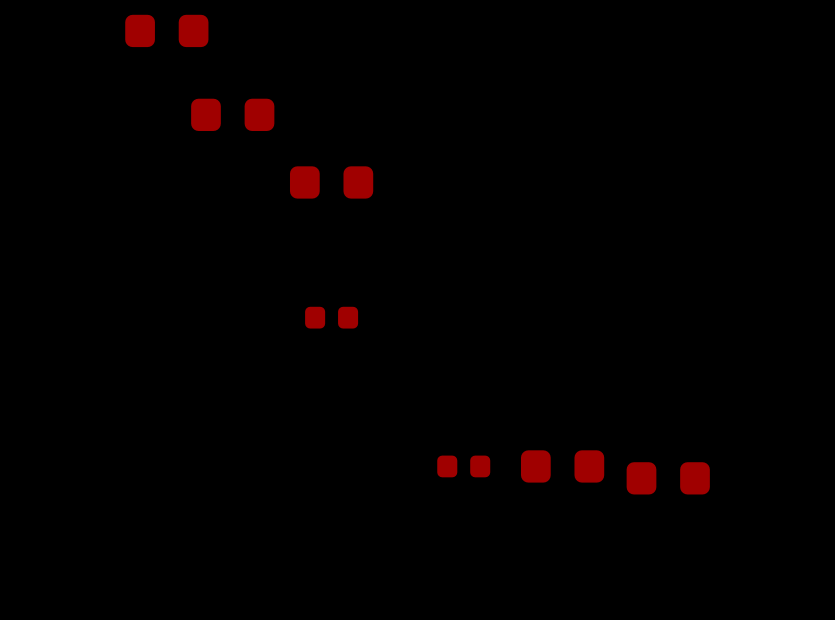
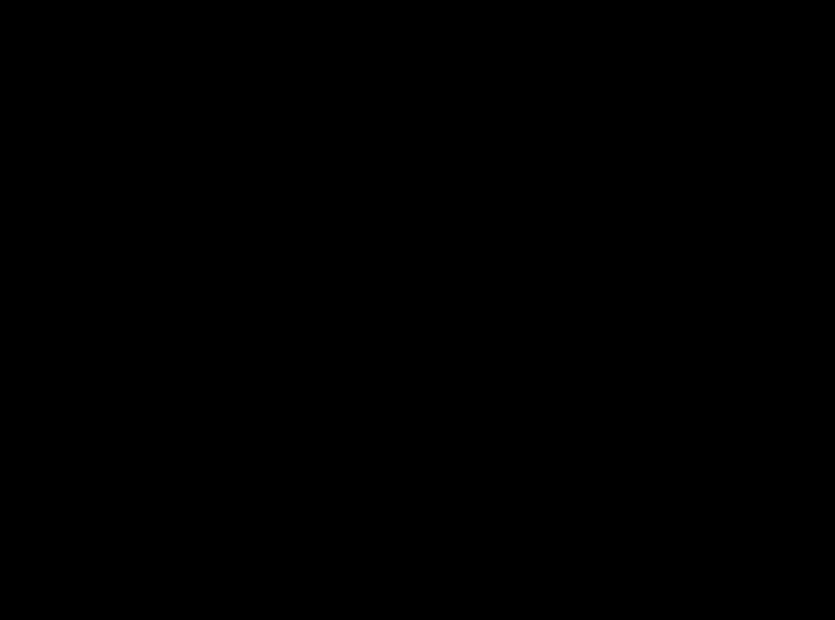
part: (166, 30) -> none
part: (232, 114) -> none
part: (331, 182) -> none
part: (331, 317) -> none
part: (463, 466) -> none
part: (562, 466) -> none
part: (668, 478) -> none

